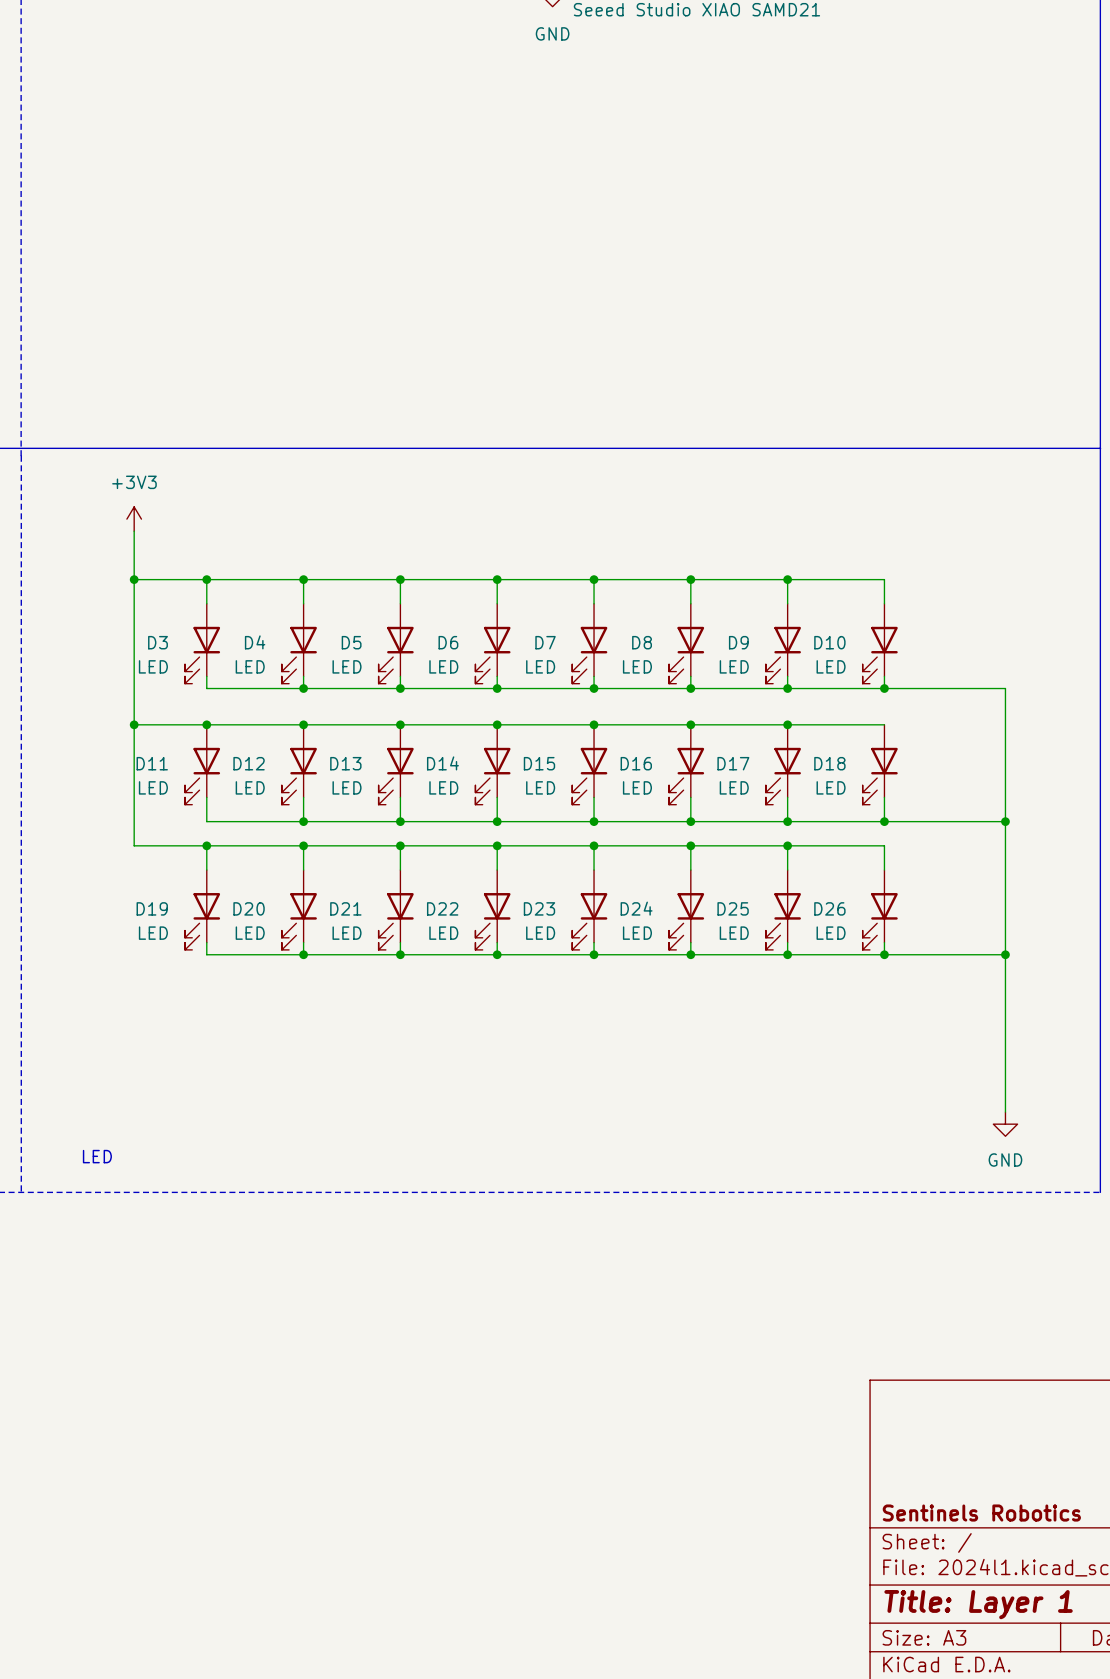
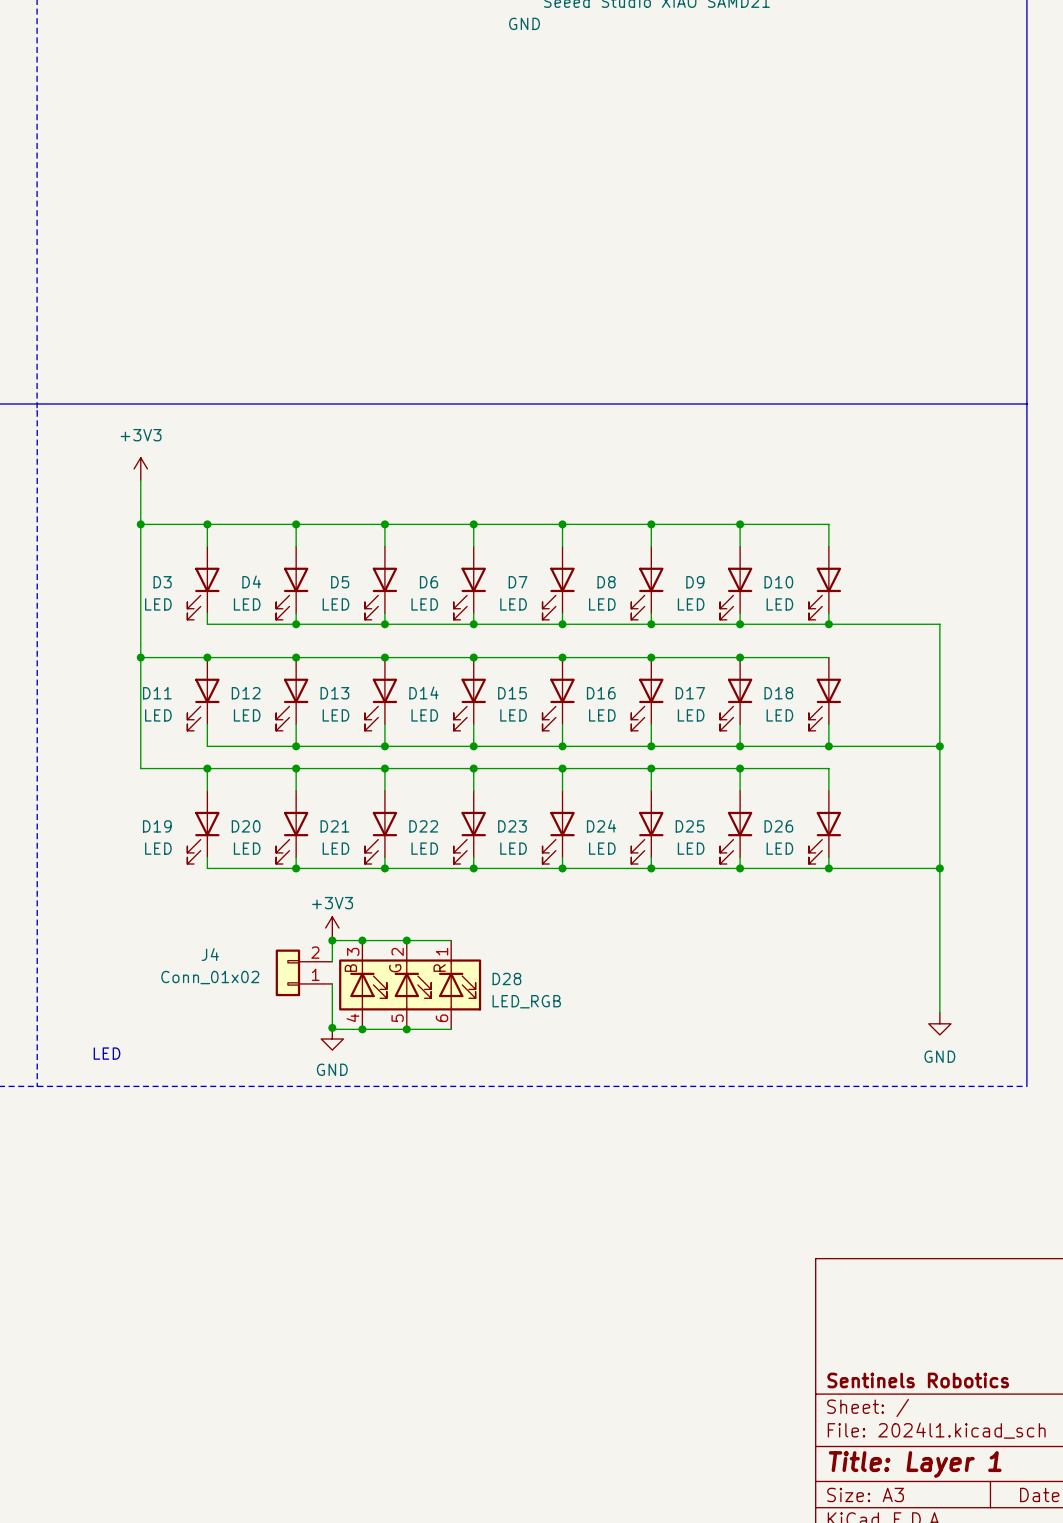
power symbol: none -> +3V3 (332, 928)
wire: none -> (332, 939) (332, 961)
wire: none -> (332, 940) (451, 940)
junction: none -> (332, 940)
junction: none -> (362, 940)
junction: none -> (406, 940)
J4: none -> Conn_01x02 (304, 972)
wire: none -> (332, 983) (332, 1029) (451, 1029)
D28: none -> LED_RGB (410, 984)
junction: none -> (332, 1027)
junction: none -> (362, 1029)
junction: none -> (406, 1029)
power symbol: none -> GND (332, 1039)

